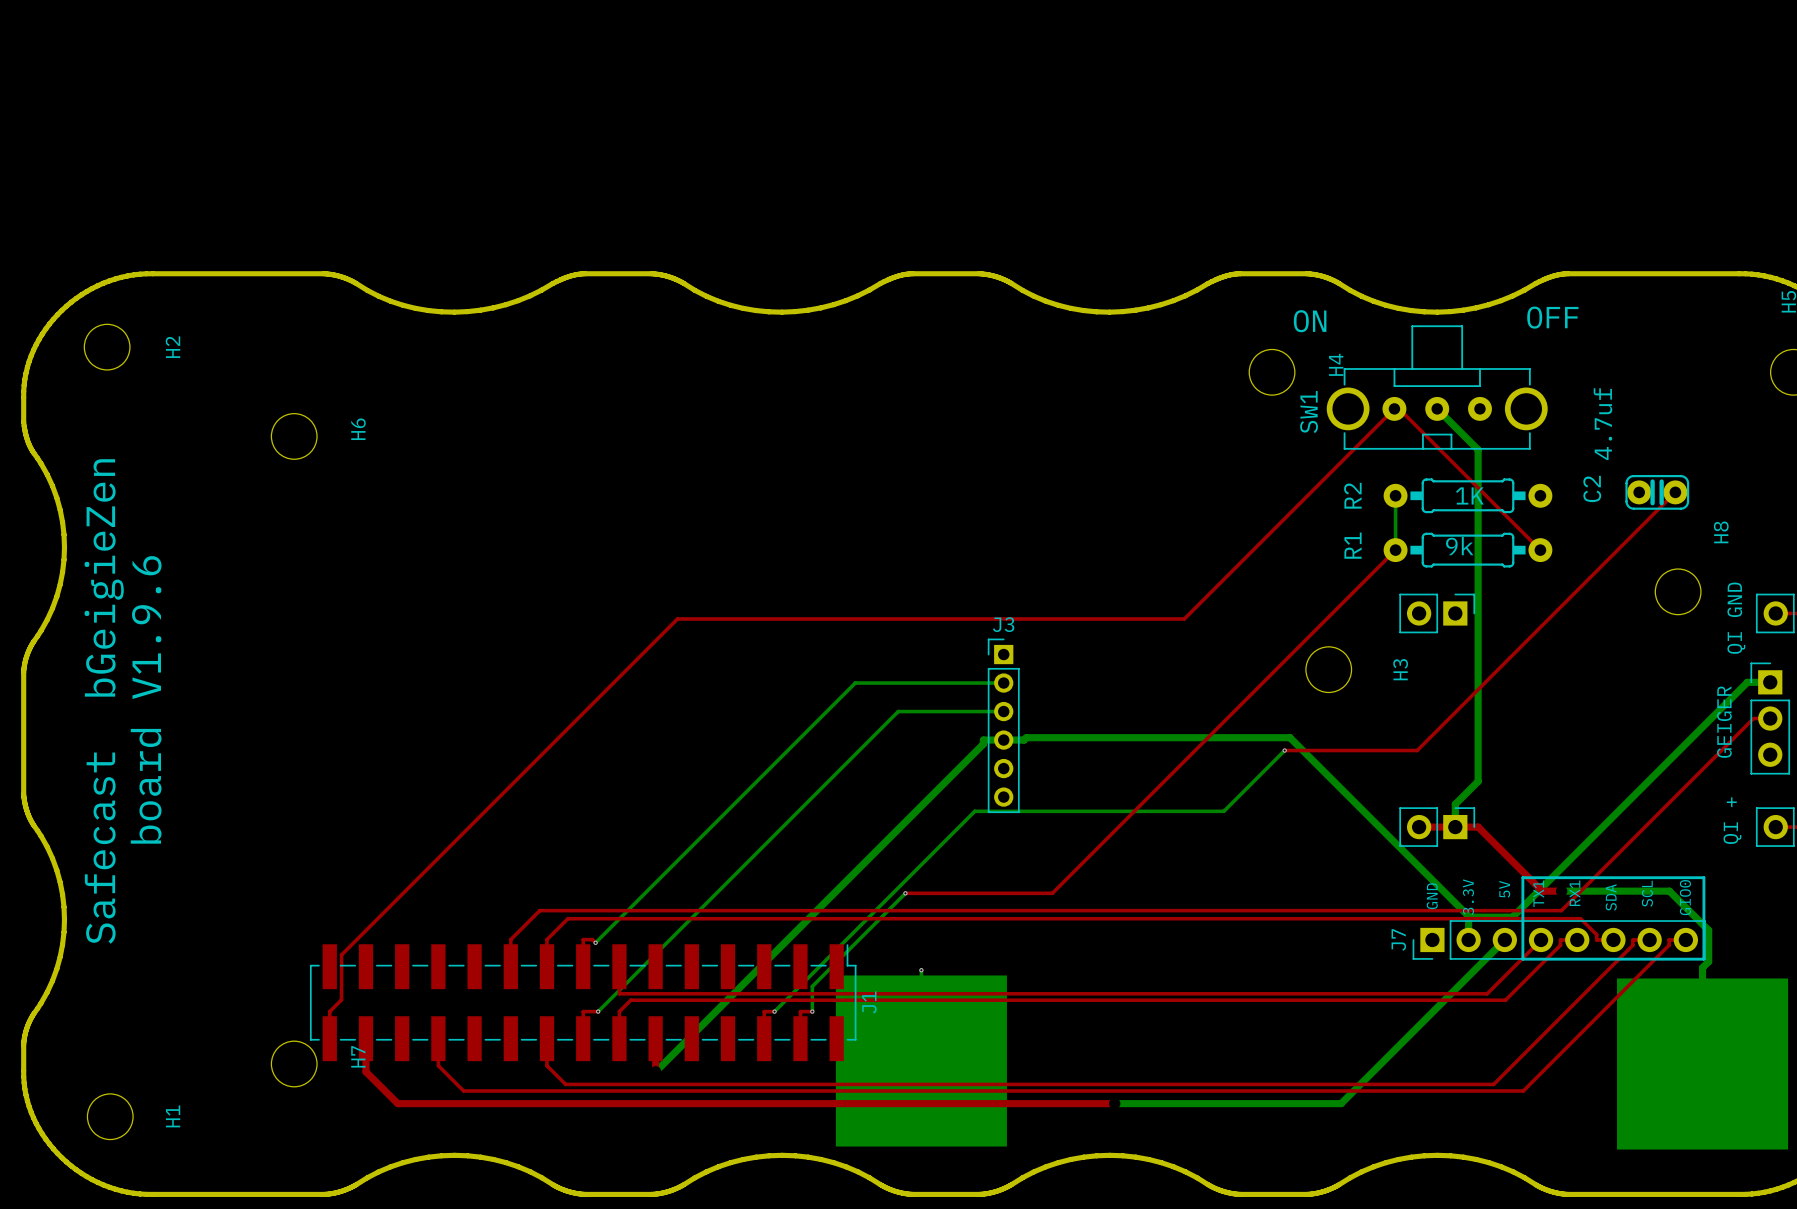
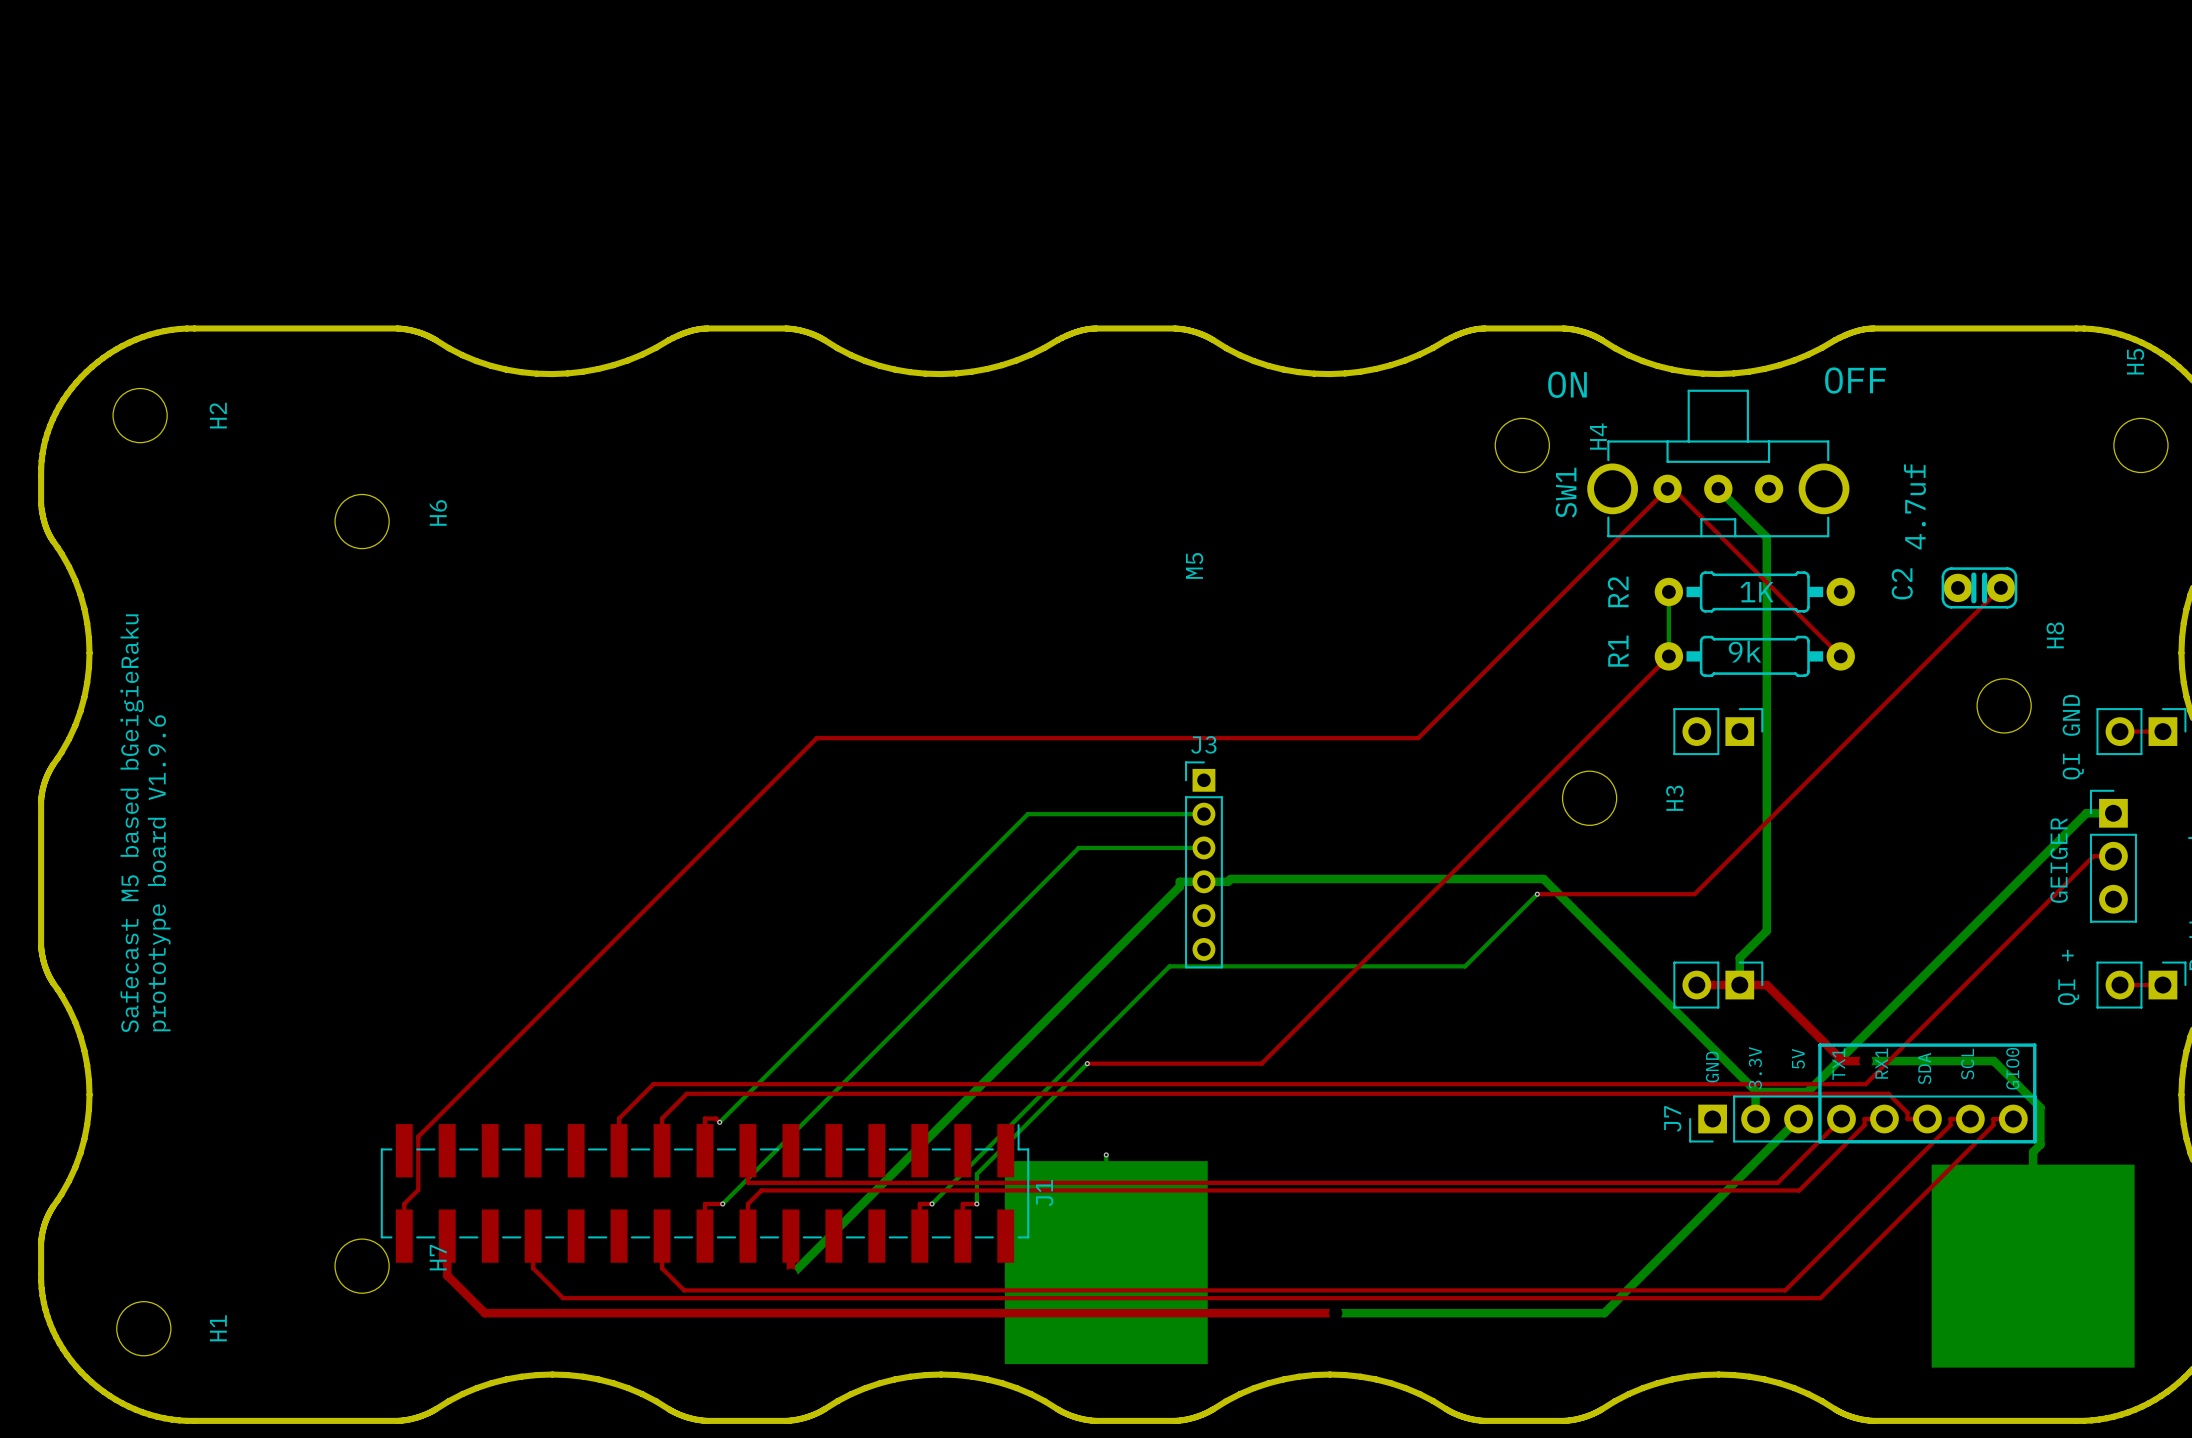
text: none -> M5 (1194, 565)
text: board V1.9.6 (146, 699) -> prototype board V1.9.6 (159, 873)
text: Safecast bGeigieZen (104, 701) -> Safecast M5 based bGeigieRaku (131, 823)

